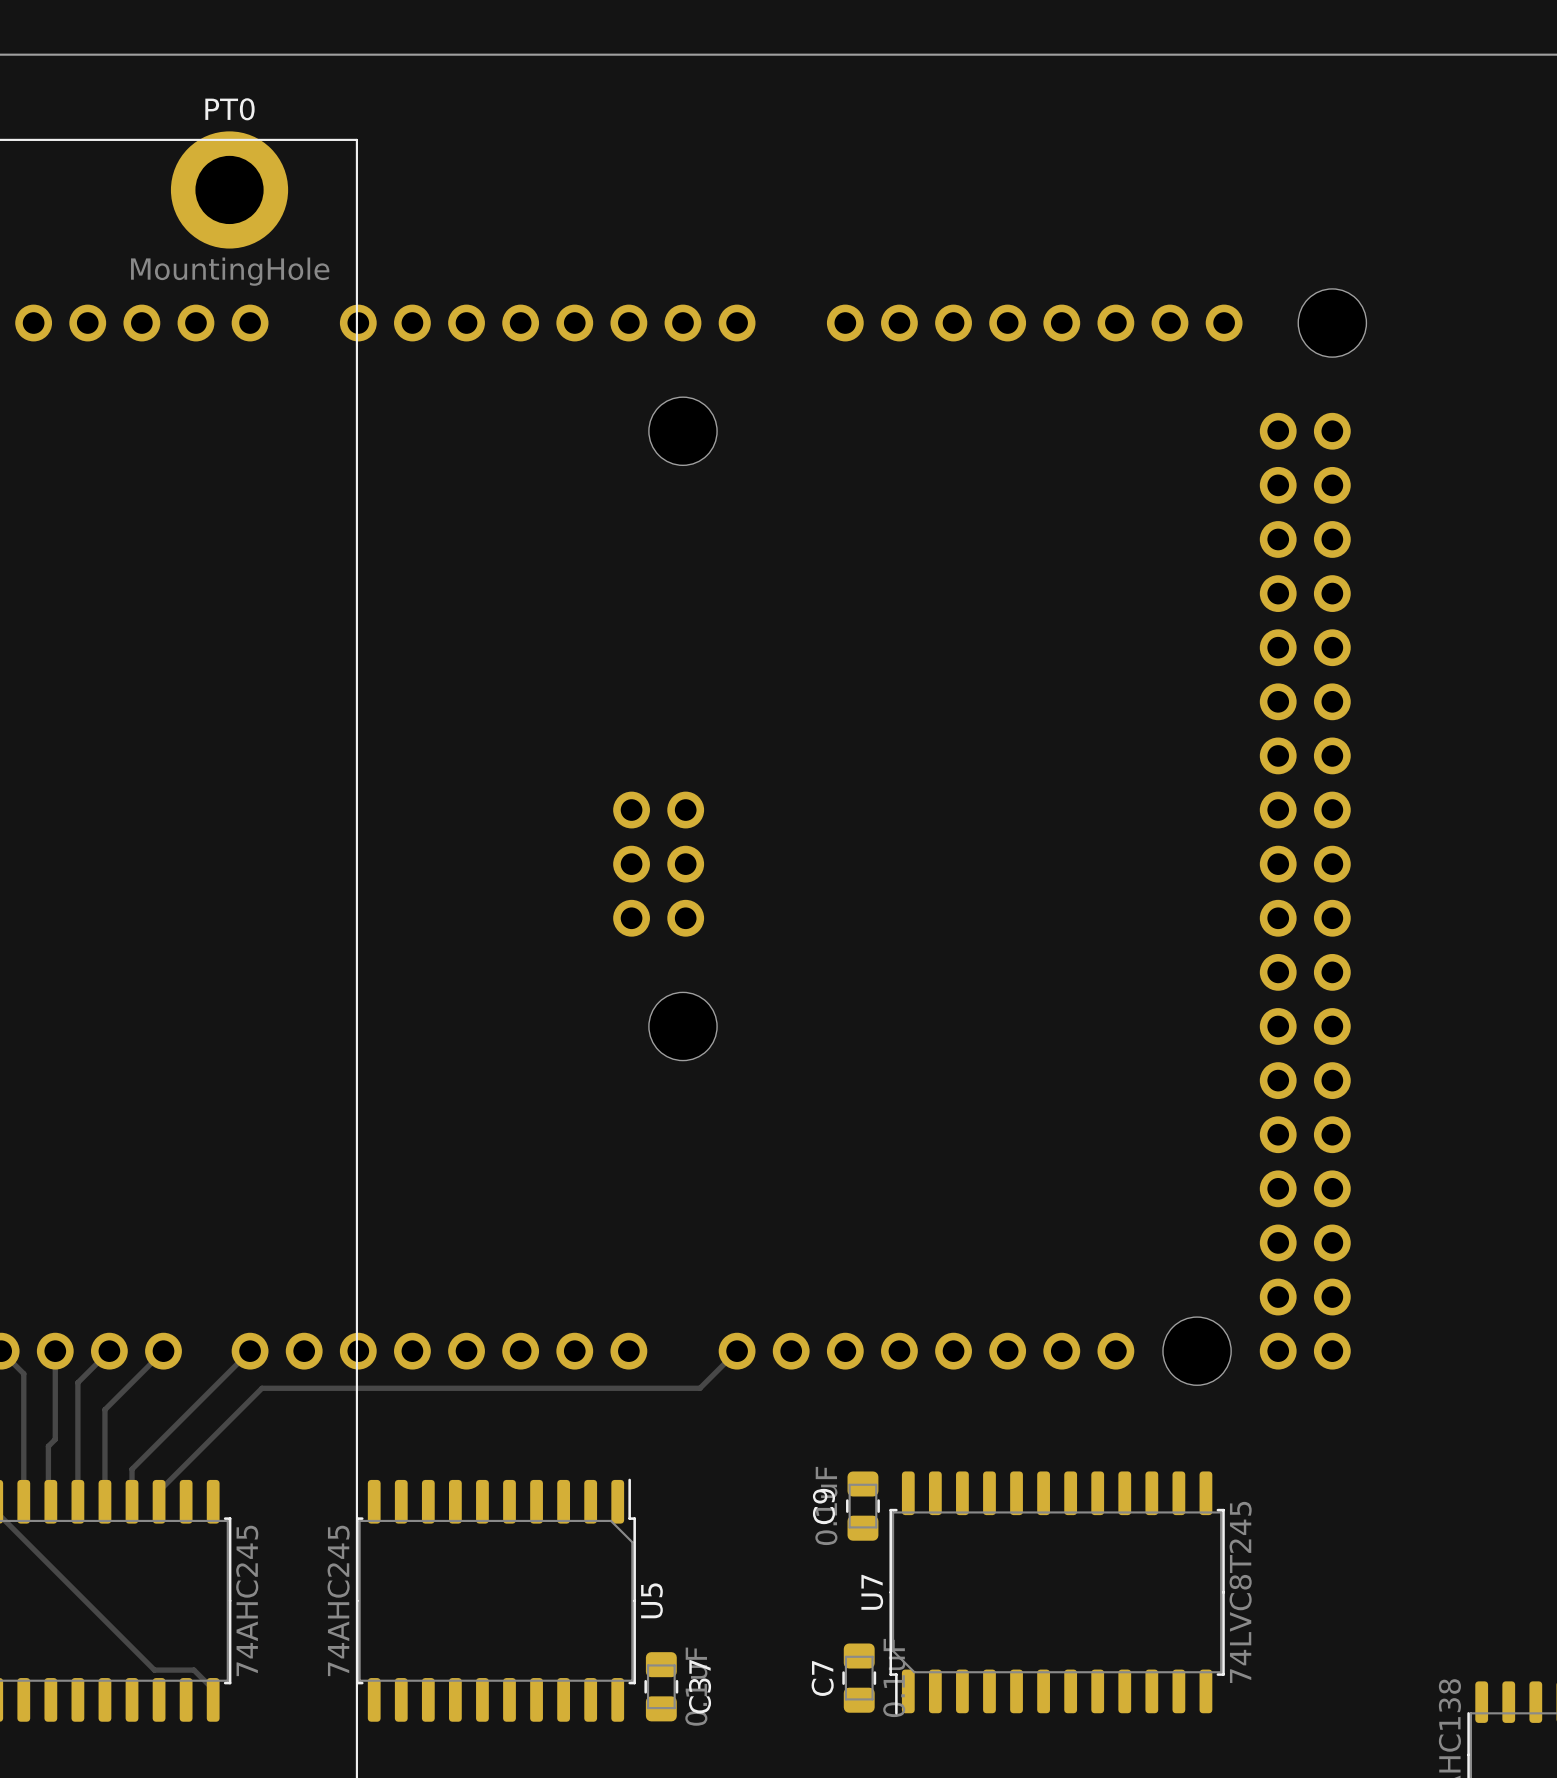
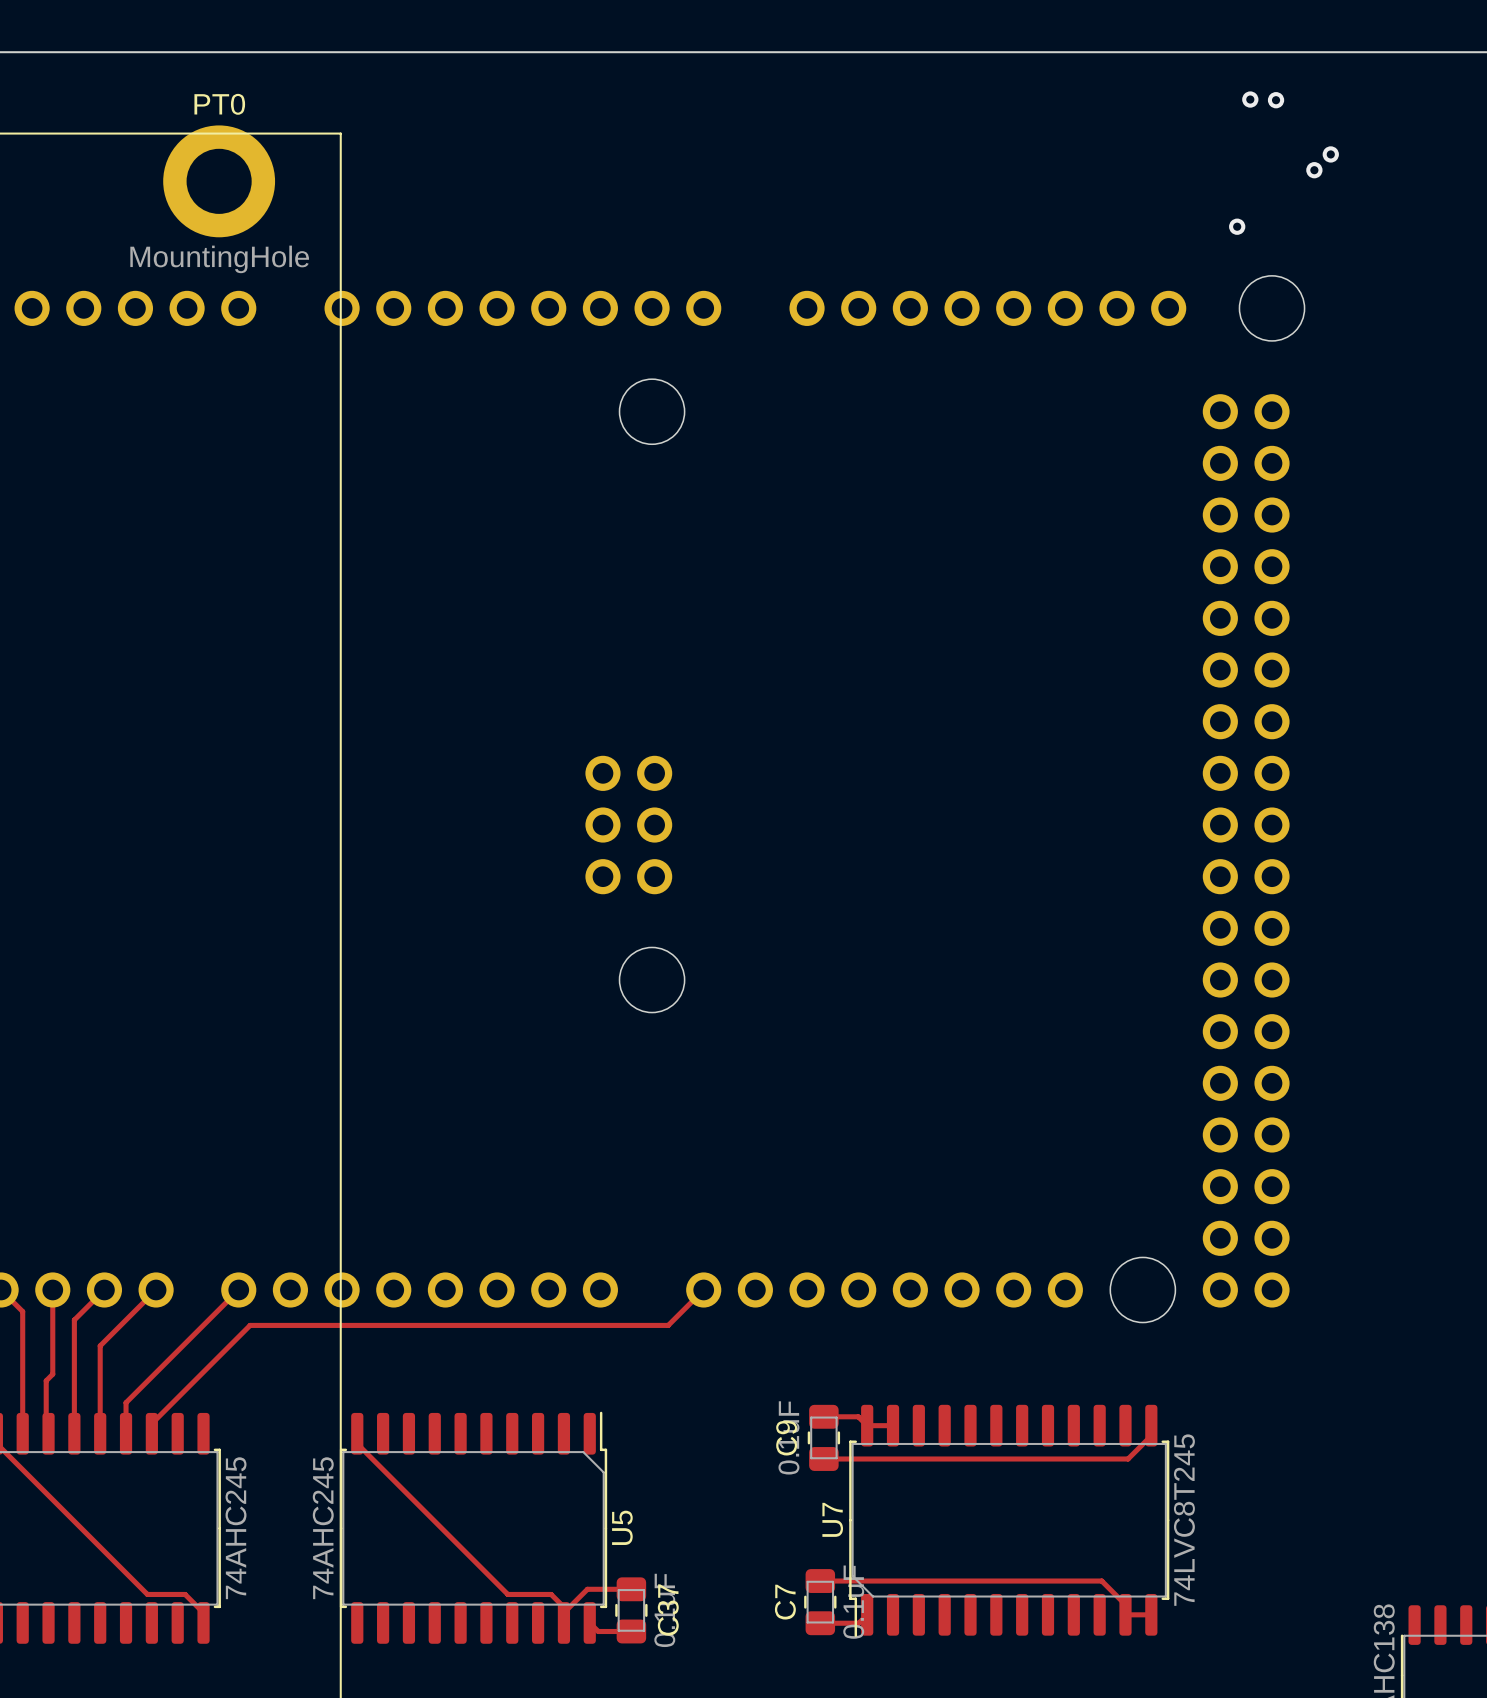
via: none -> (1250, 99)
via: none -> (1276, 100)
via: none -> (1330, 154)
via: none -> (1314, 170)
via: none -> (1237, 226)
track: none -> (823, 1416) (858, 1416) (867, 1425) (893, 1425)
track: none -> (1151, 1425) (1151, 1435) (1128, 1458) (823, 1458)
track: none -> (357, 1433) (357, 1443) (507, 1594) (551, 1594) (563, 1607) (563, 1622)
track: none -> (820, 1581) (1101, 1581) (1125, 1604) (1125, 1614) (1151, 1614)
track: none -> (631, 1589) (587, 1589) (563, 1612)
track: none -> (867, 1614) (858, 1623) (820, 1623)
track: none -> (589, 1622) (598, 1631) (631, 1631)

